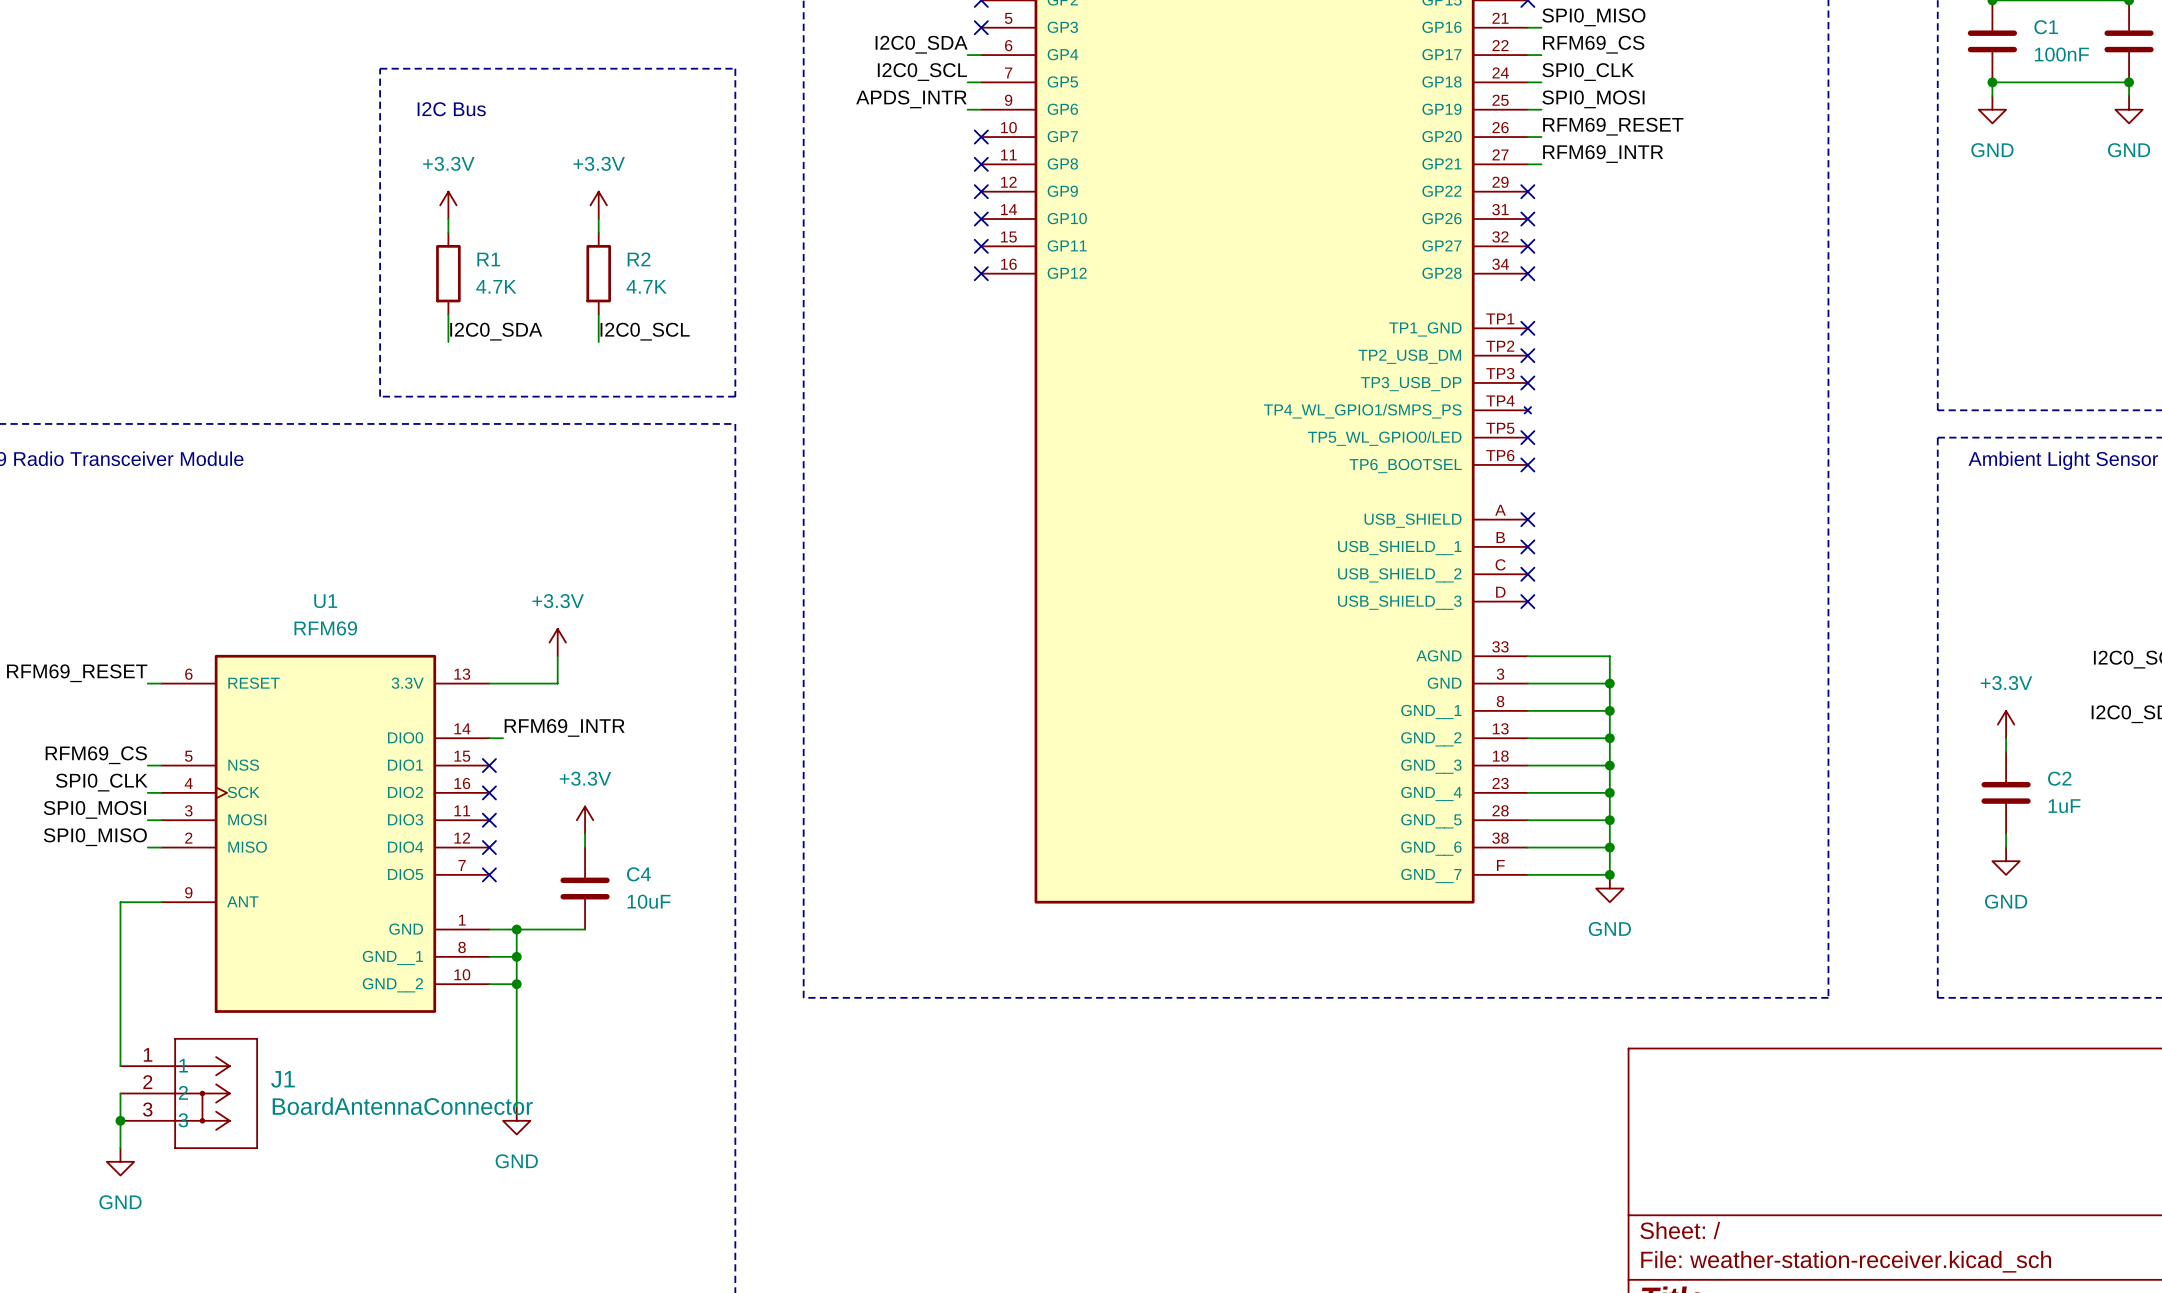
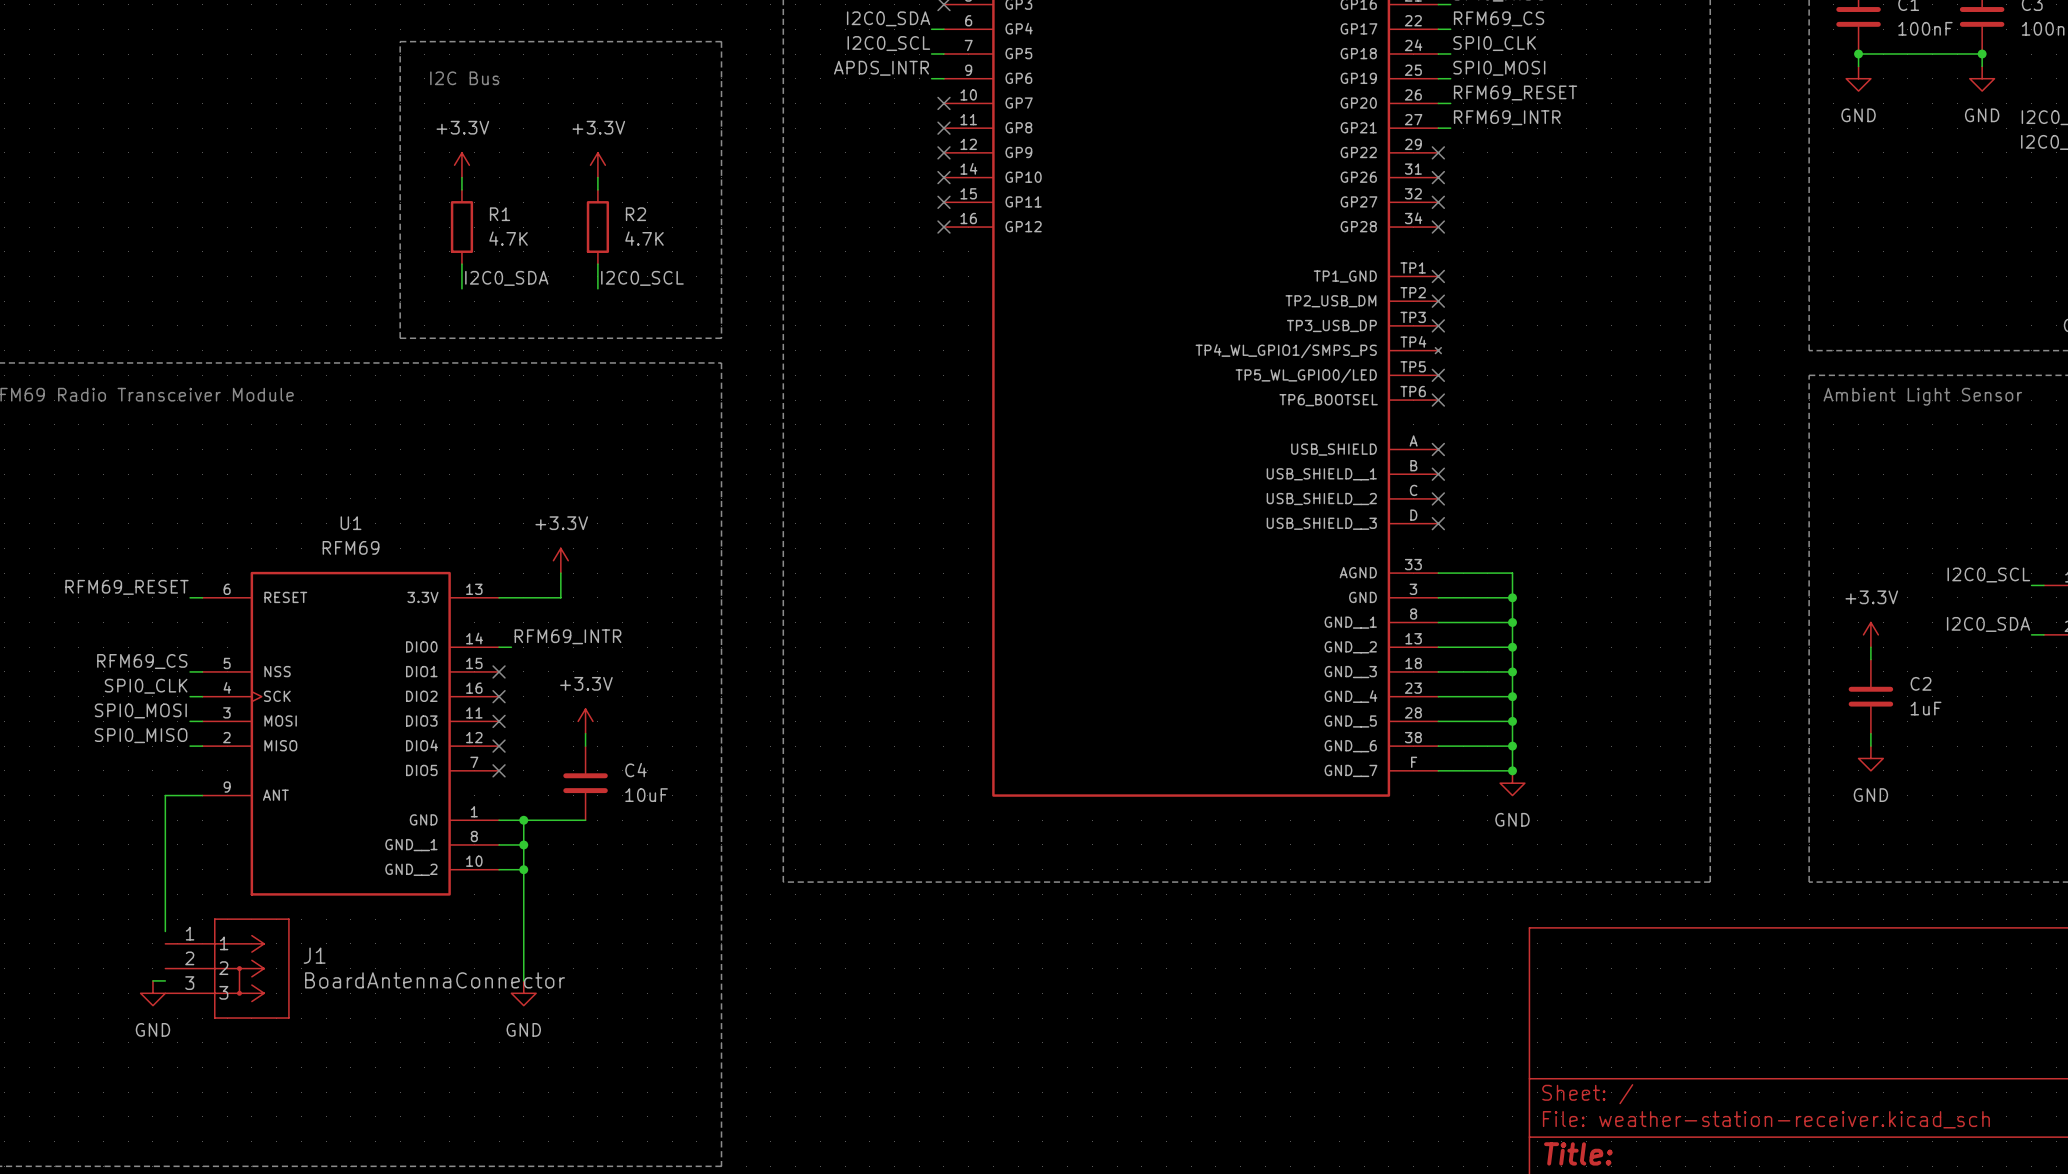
wire: (120, 1052) (120, 1066) -> none
wire: (120, 1093) (120, 1148) -> none
wire: none -> (152, 980) (165, 980)
junction: (120, 1120) -> none
power symbol position: GND (120, 1161) -> GND (152, 993)

